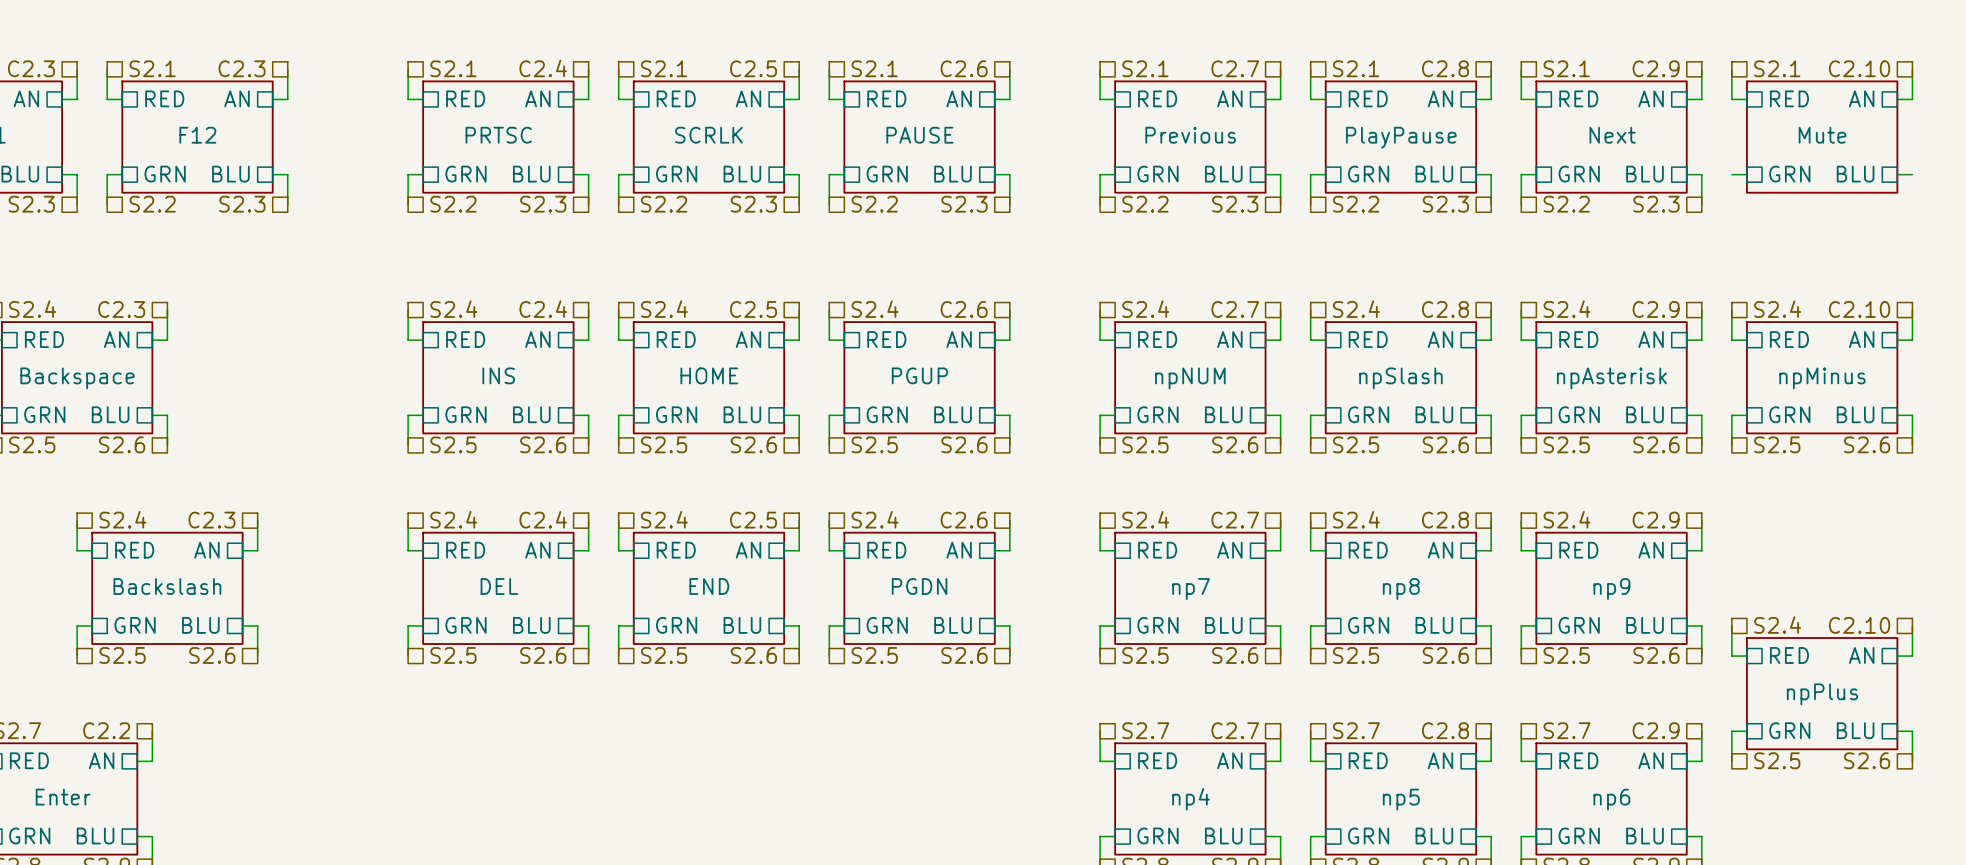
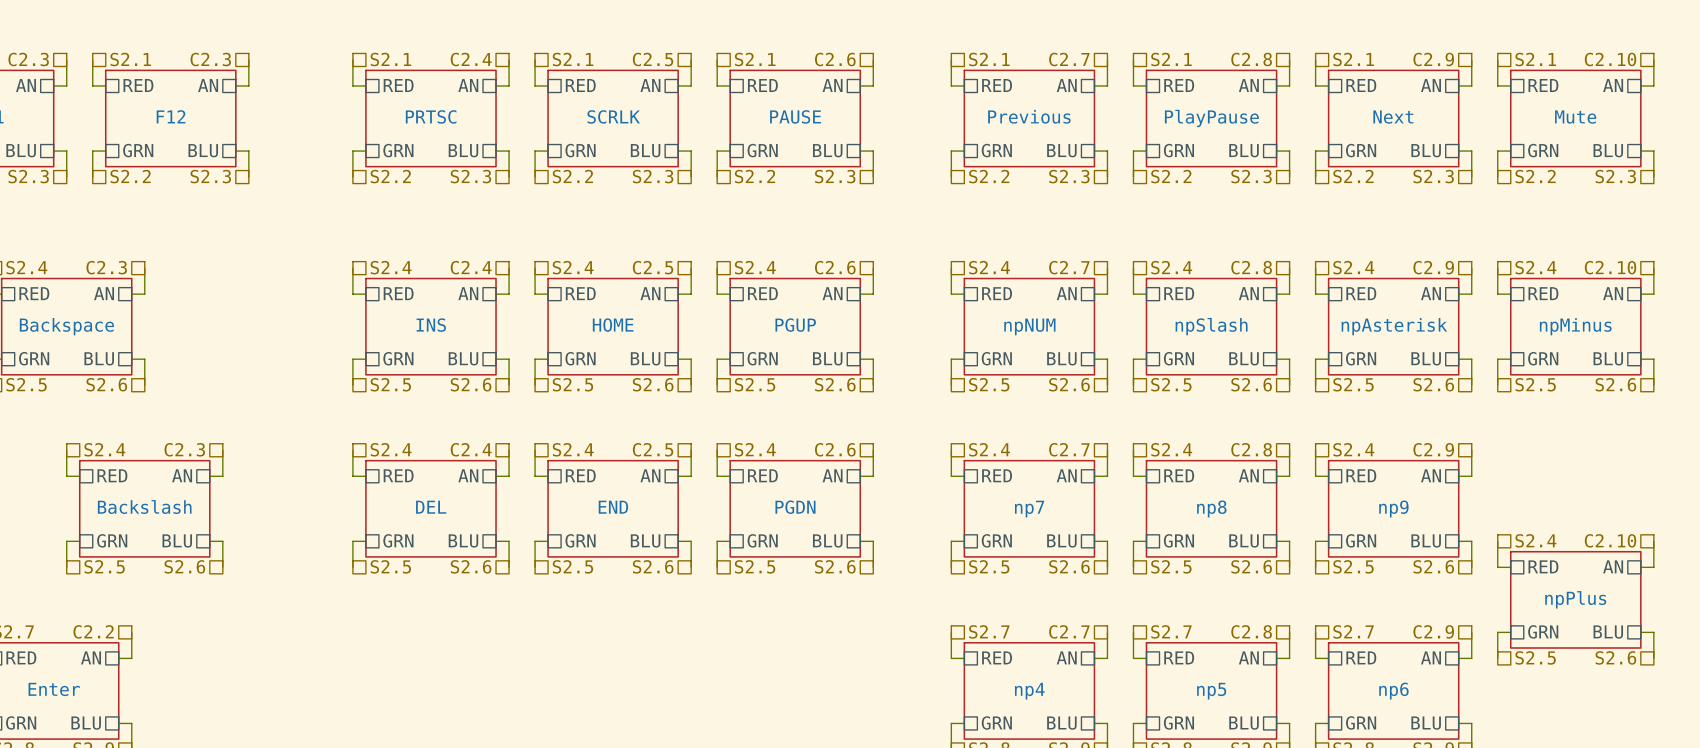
wire: none -> (1497, 151) (1497, 177)
wire: none -> (1653, 151) (1653, 177)
hierarchical label: none -> S2.2 (1535, 176)
hierarchical label: none -> S2.3 (1615, 176)

